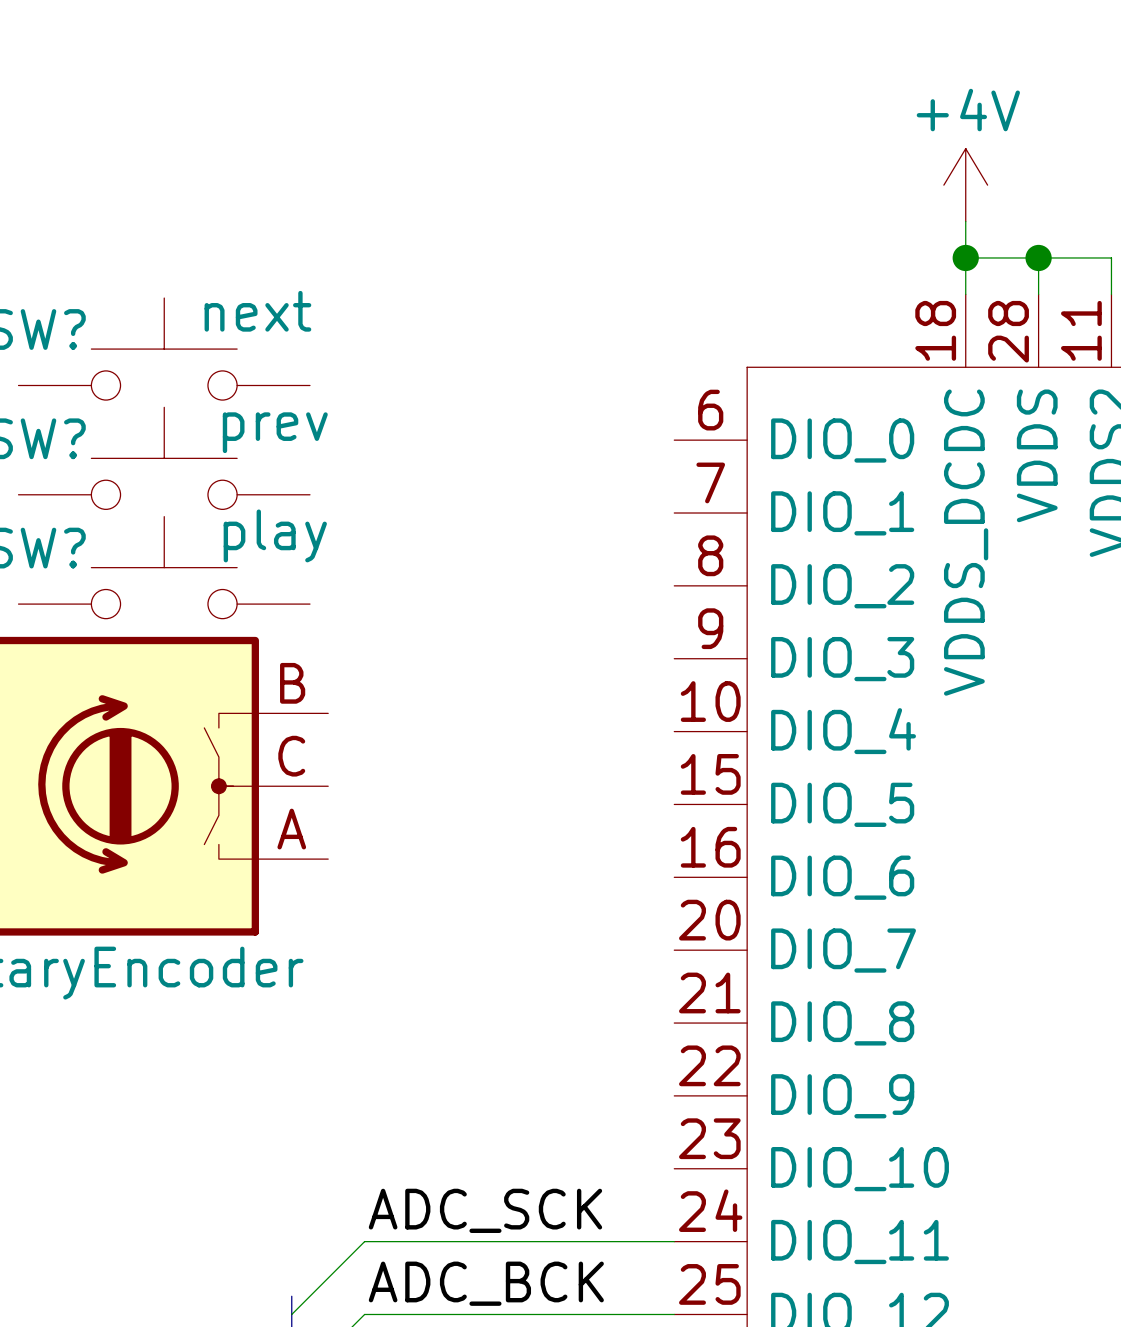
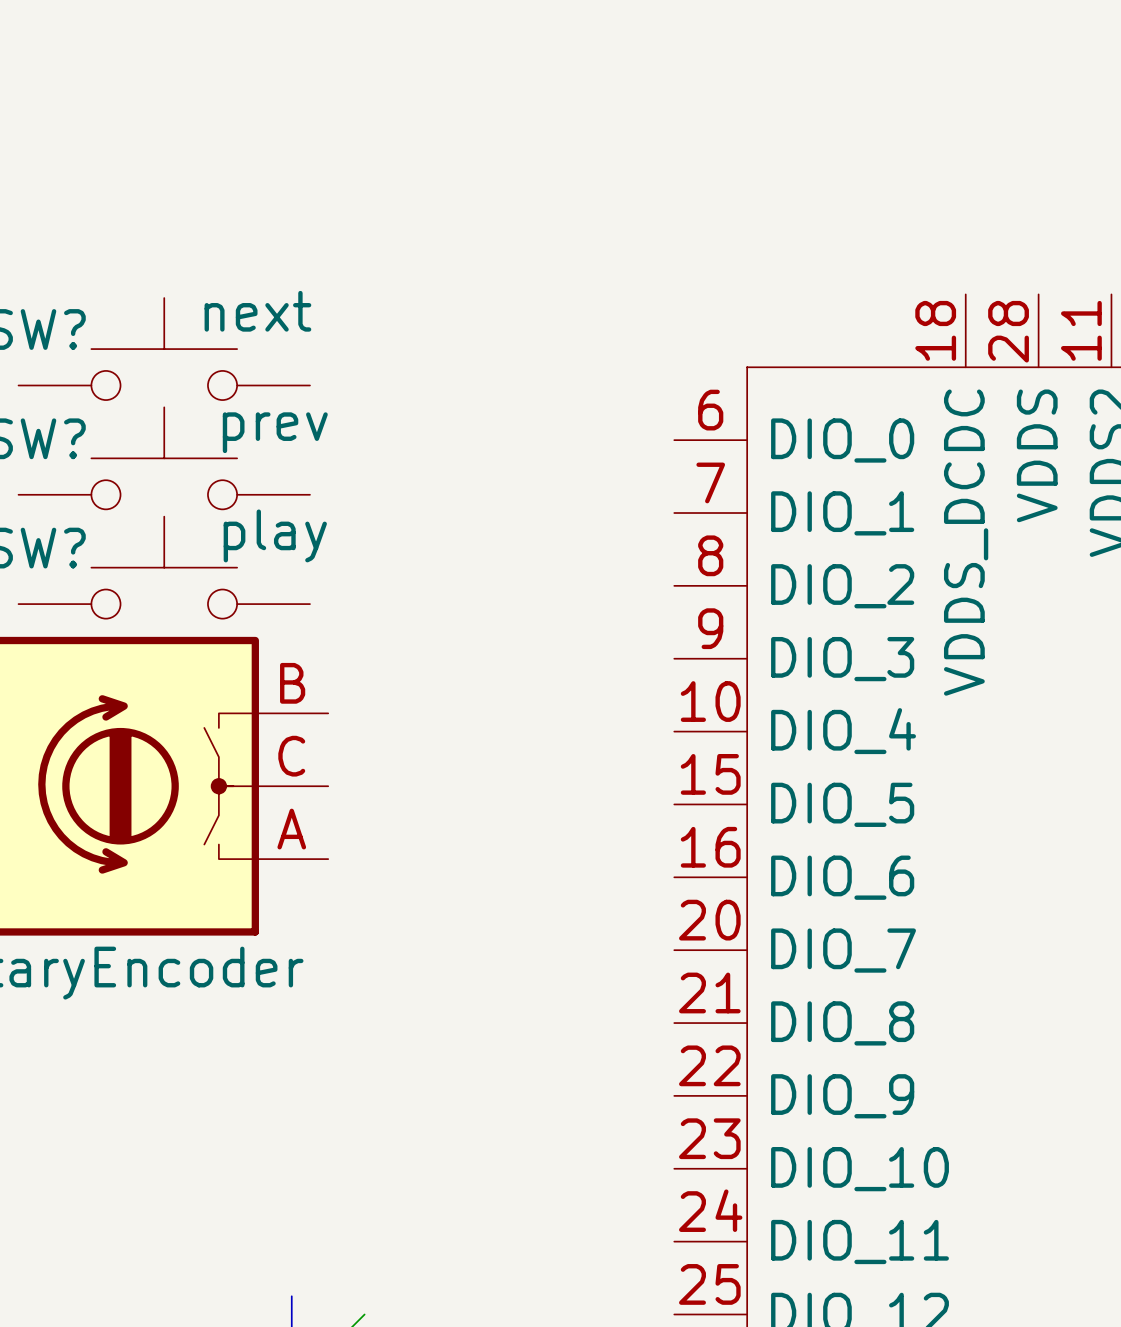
power symbol: +4V (965, 185) -> none
wire: (965, 221) (965, 294) -> none
wire: (965, 257) (1111, 257) (1111, 294) -> none
junction: (965, 257) -> none
wire: (1038, 257) (1038, 294) -> none
junction: (1038, 257) -> none
label: ADC_SCK (485, 1210) -> none
wire: (364, 1241) (291, 1314) -> none
wire: (364, 1241) (674, 1241) -> none
label: ADC_BCK (486, 1283) -> none
wire: (364, 1314) (674, 1314) -> none

